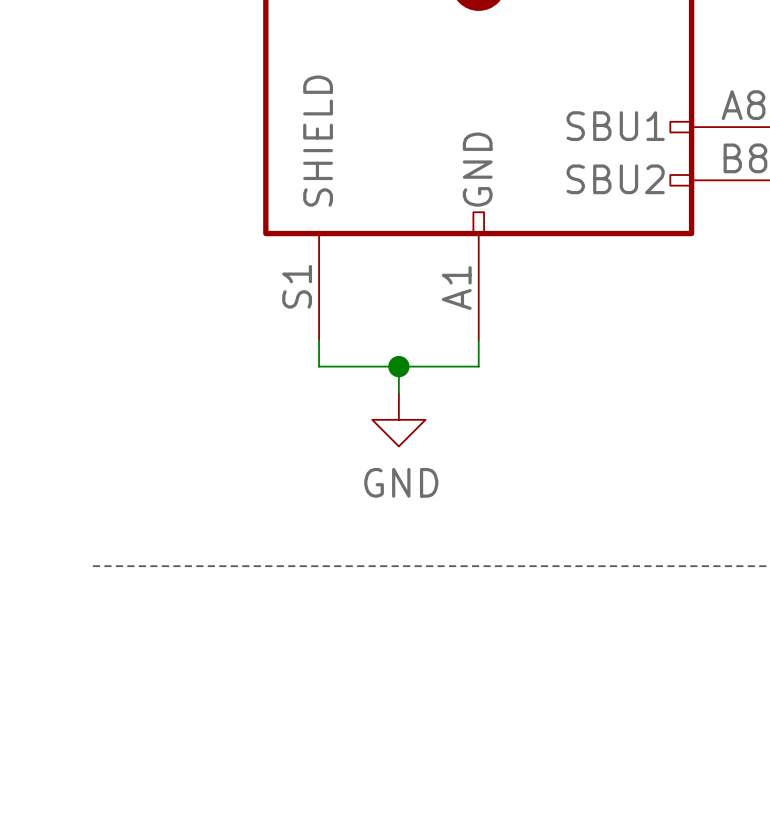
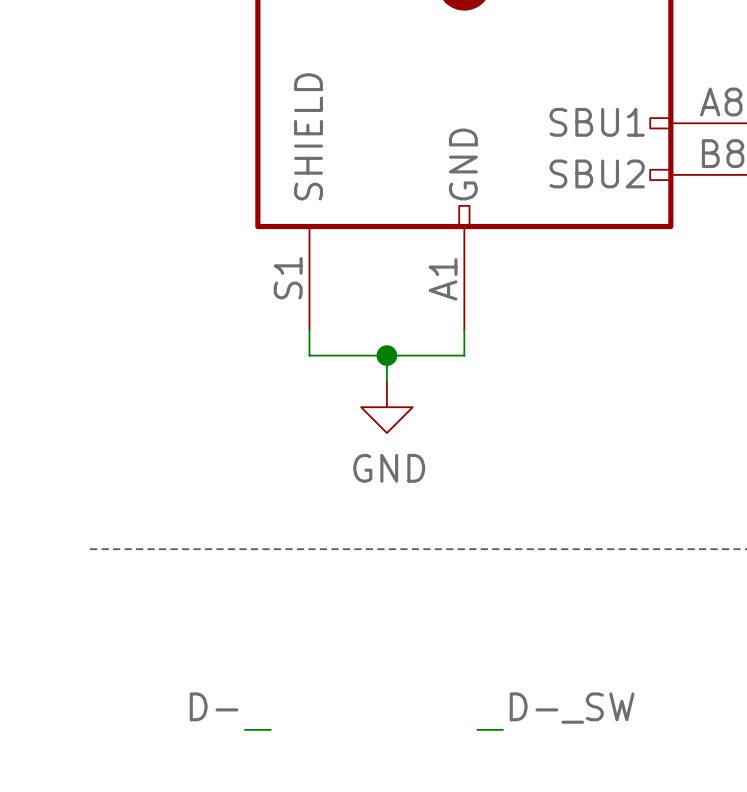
label: none -> D- (214, 706)
label: none -> D-_SW (572, 708)
wire: none -> (244, 729) (270, 729)
wire: none -> (477, 729) (503, 729)

